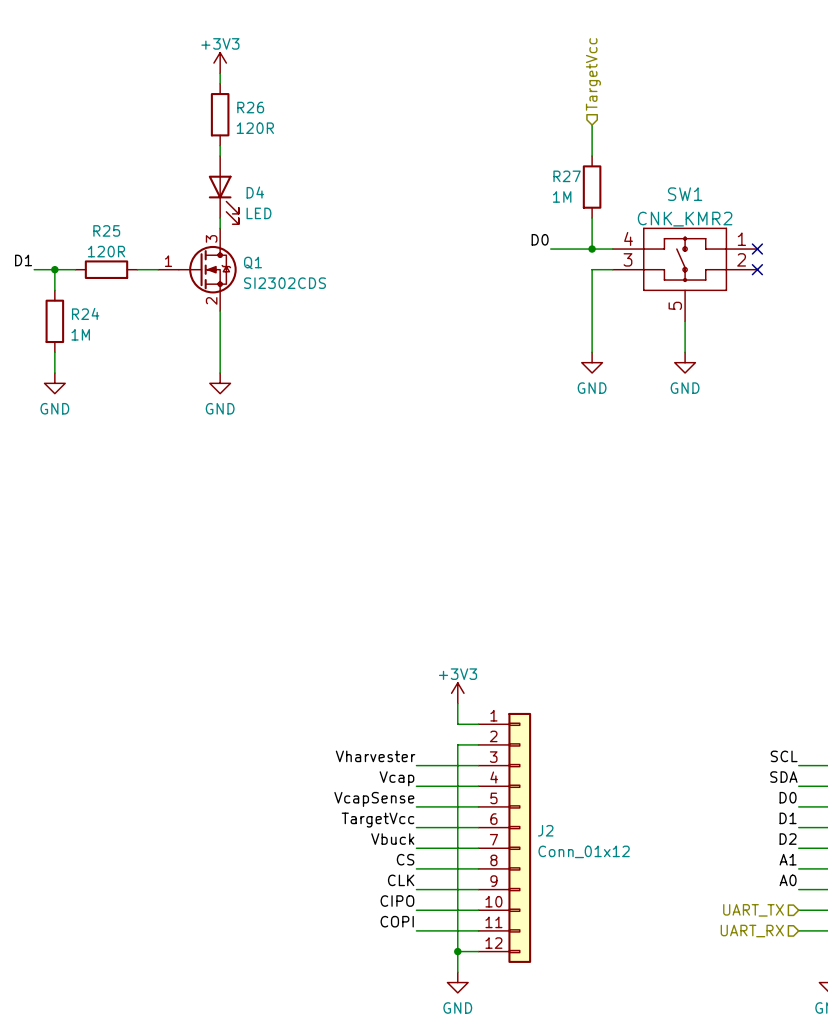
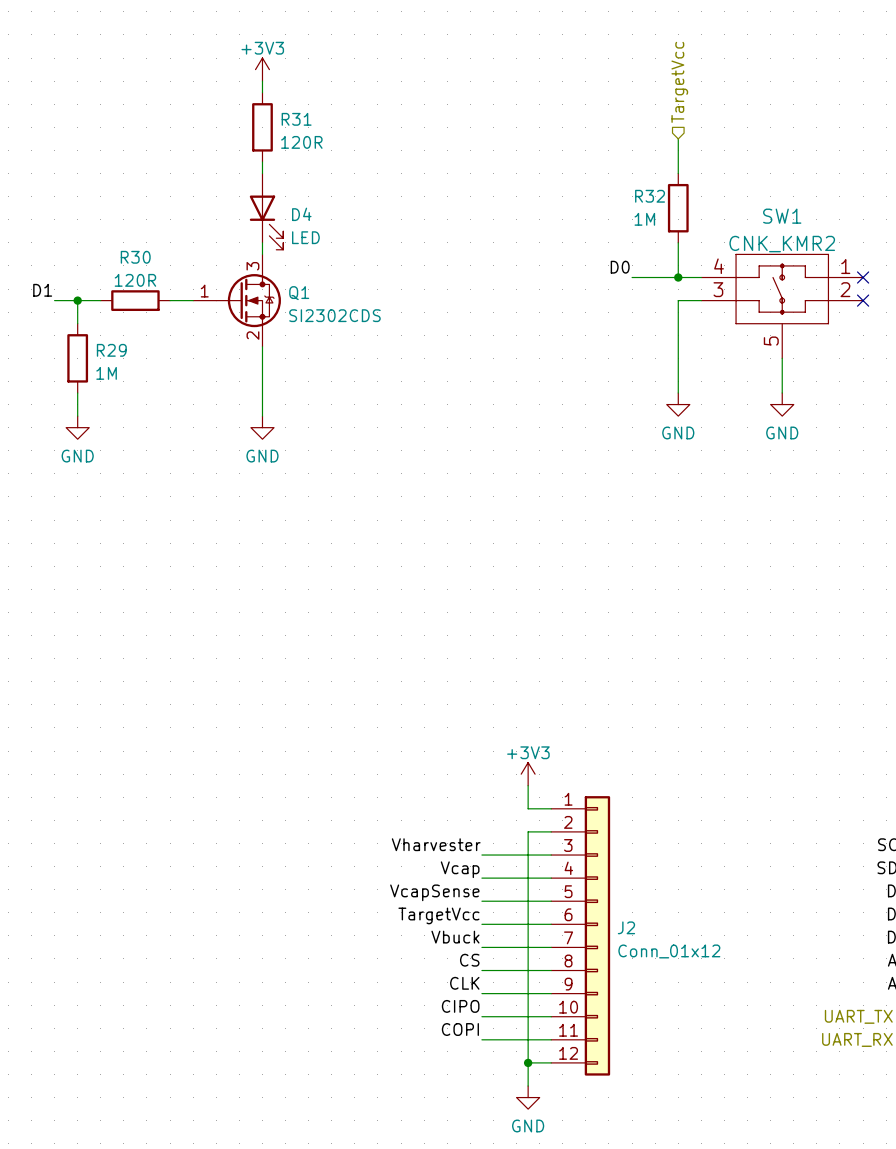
R26 name: R26 (250, 107) -> R31 (296, 119)
R27 name: R27 (567, 176) -> R32 (650, 196)
R25 name: R25 (106, 230) -> R30 (135, 257)
R24 name: R24 (85, 313) -> R29 (111, 350)

